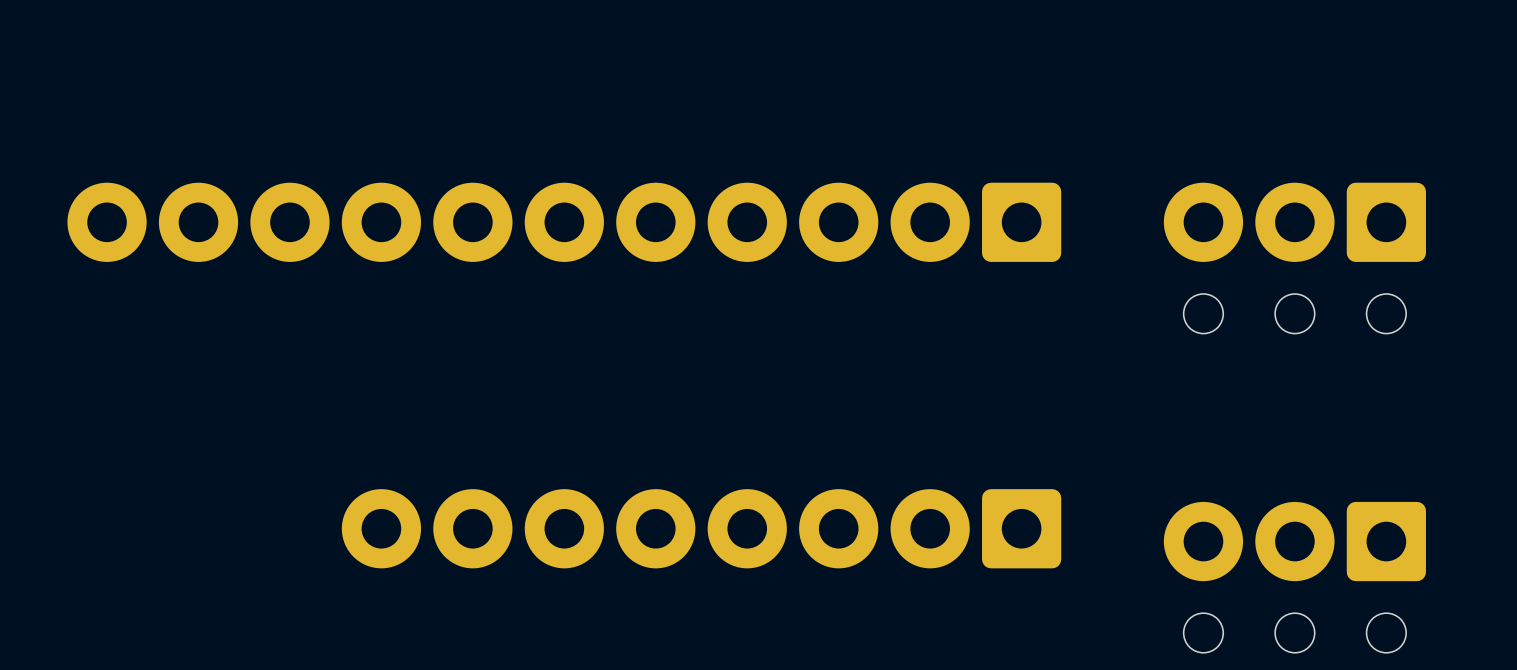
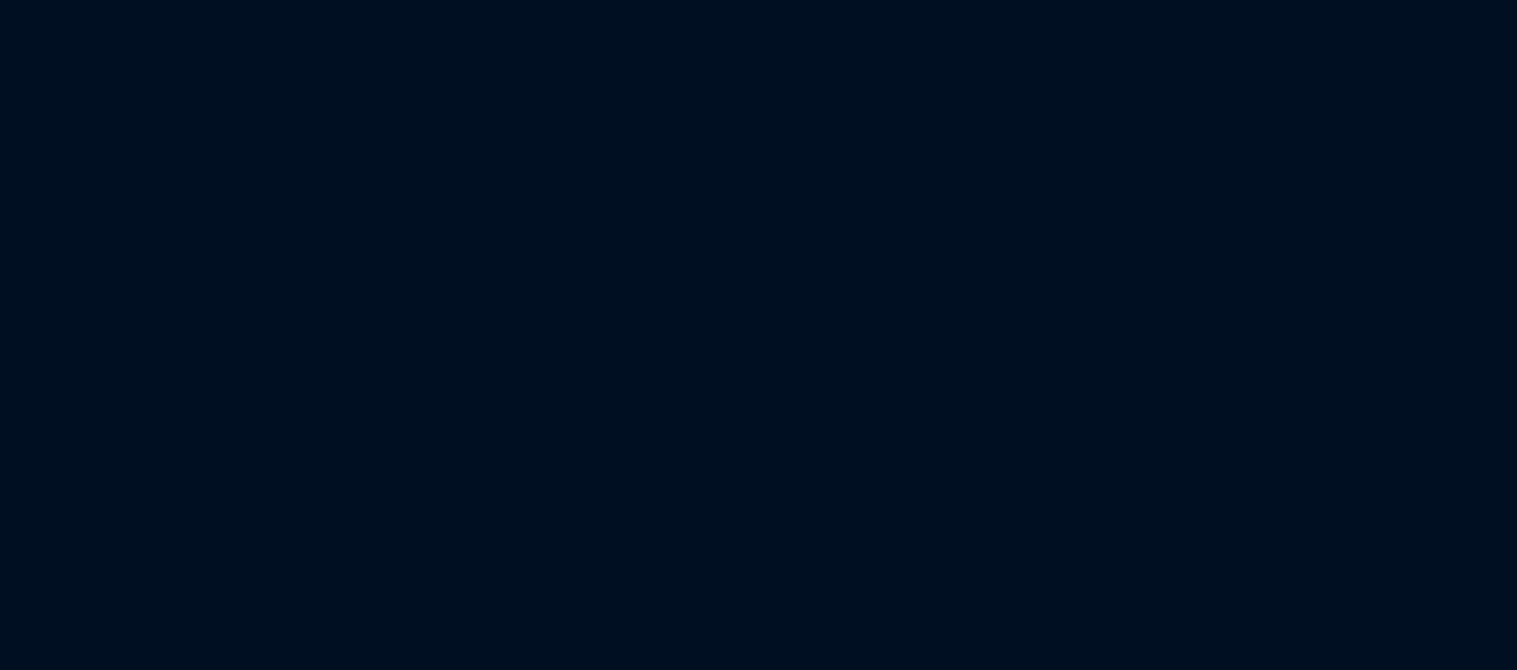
part: (564, 222) -> none
part: (1294, 258) -> none
part: (701, 528) -> none
part: (1294, 577) -> none

